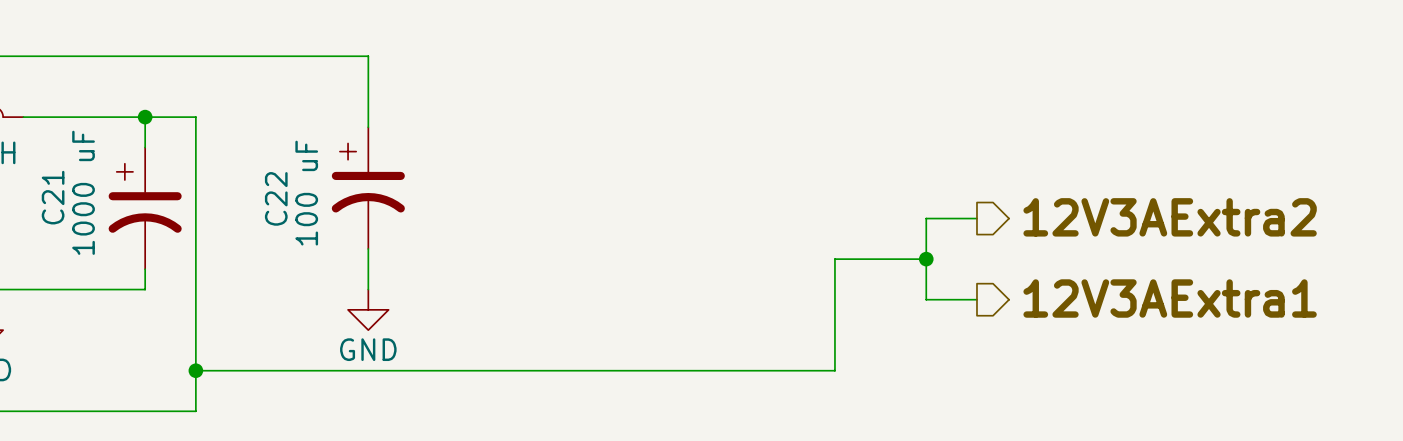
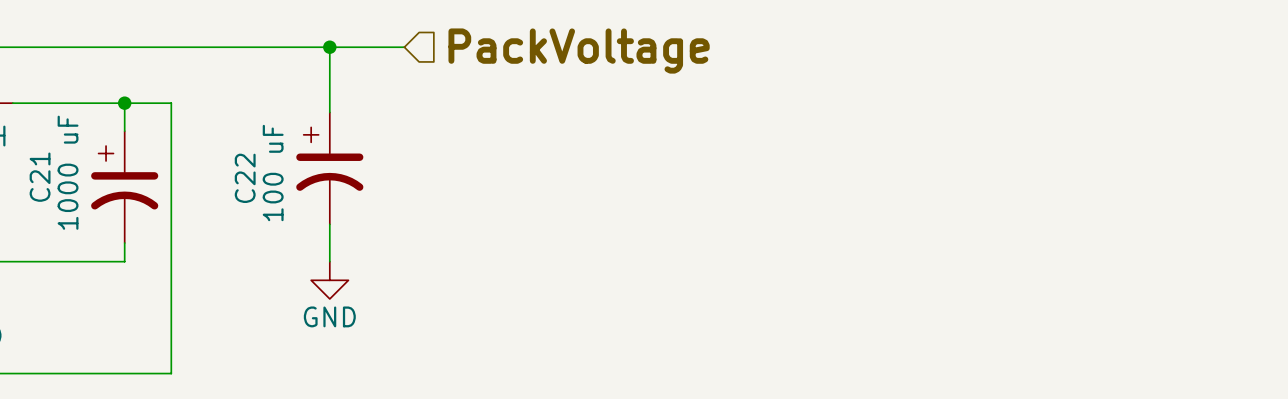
wire: none -> (329, 47) (404, 47)
junction: none -> (329, 47)
hierarchical label: none -> PackVoltage (579, 51)
hierarchical label: 12V3AExtra2 (1170, 217) -> none
wire: (976, 218) (926, 218) (926, 299) (976, 299) -> none
wire: (926, 259) (834, 259) (834, 370) (195, 370) -> none
junction: (926, 259) -> none
hierarchical label: 12V3AExtra1 (1170, 298) -> none
junction: (195, 370) -> none

